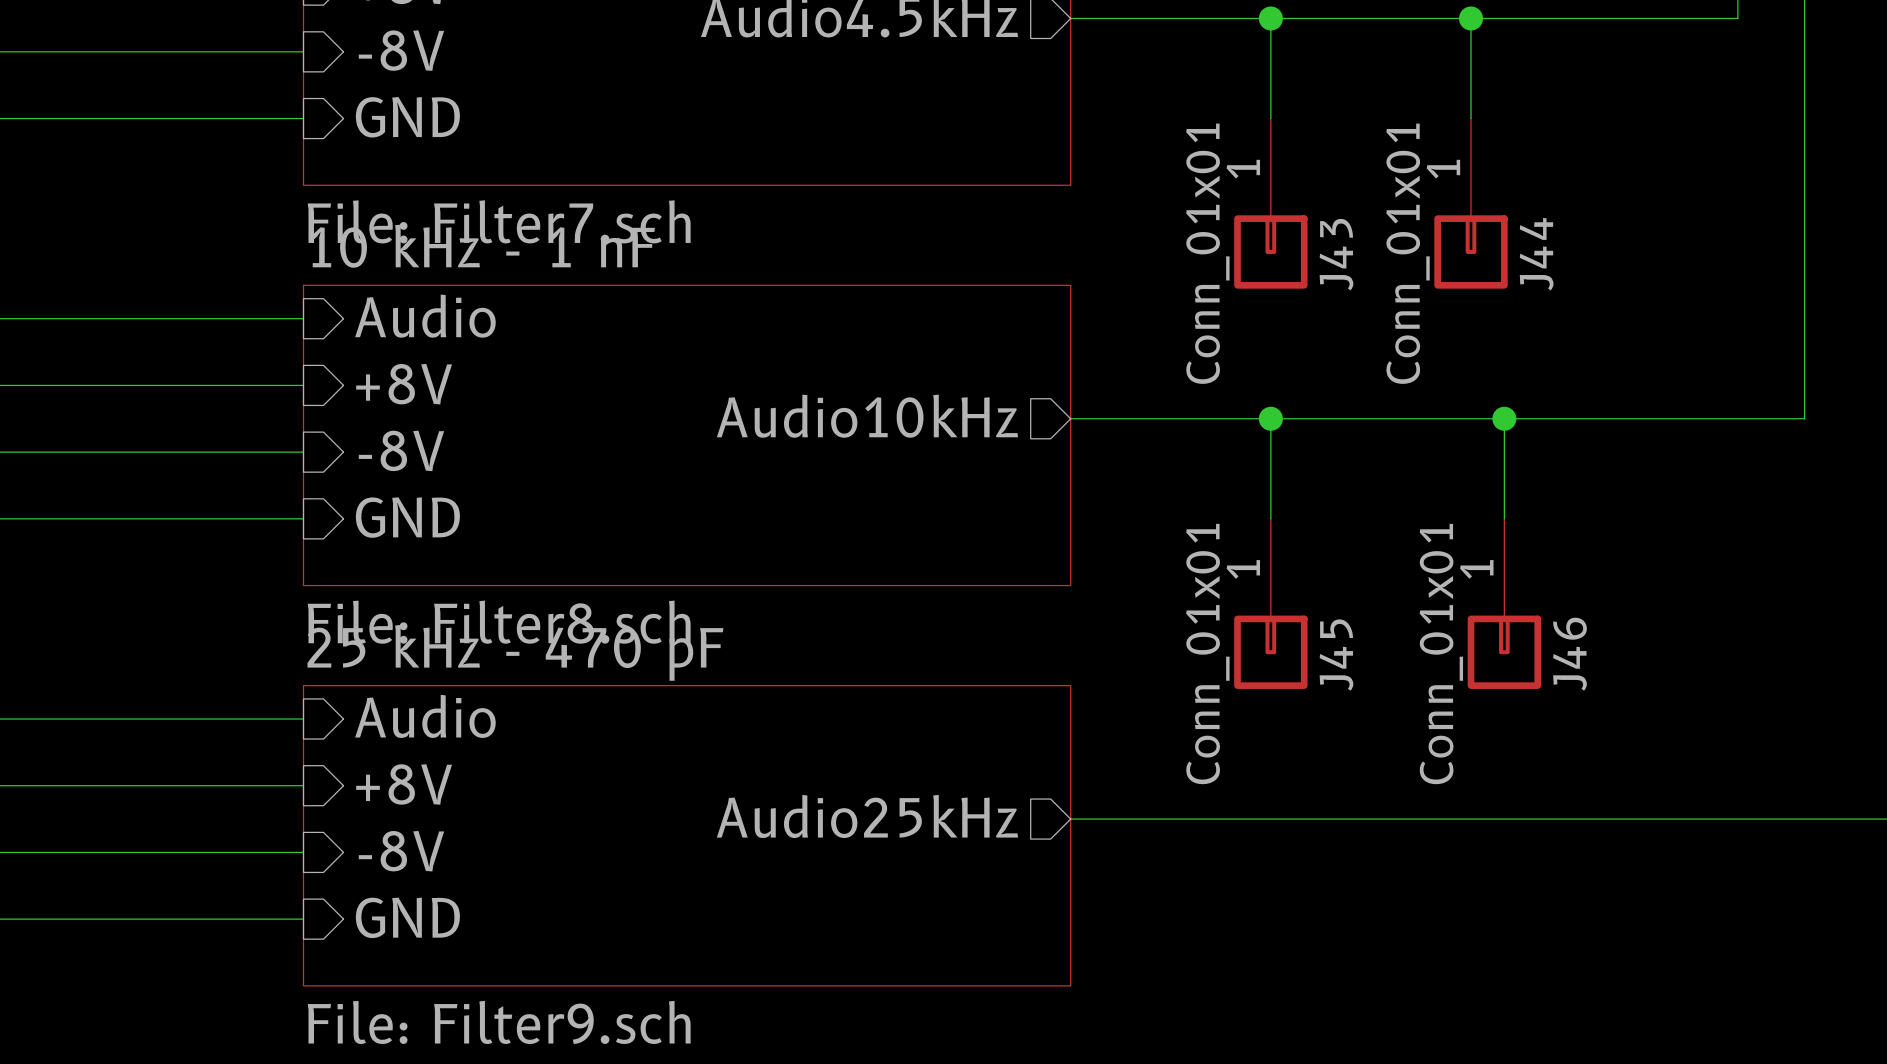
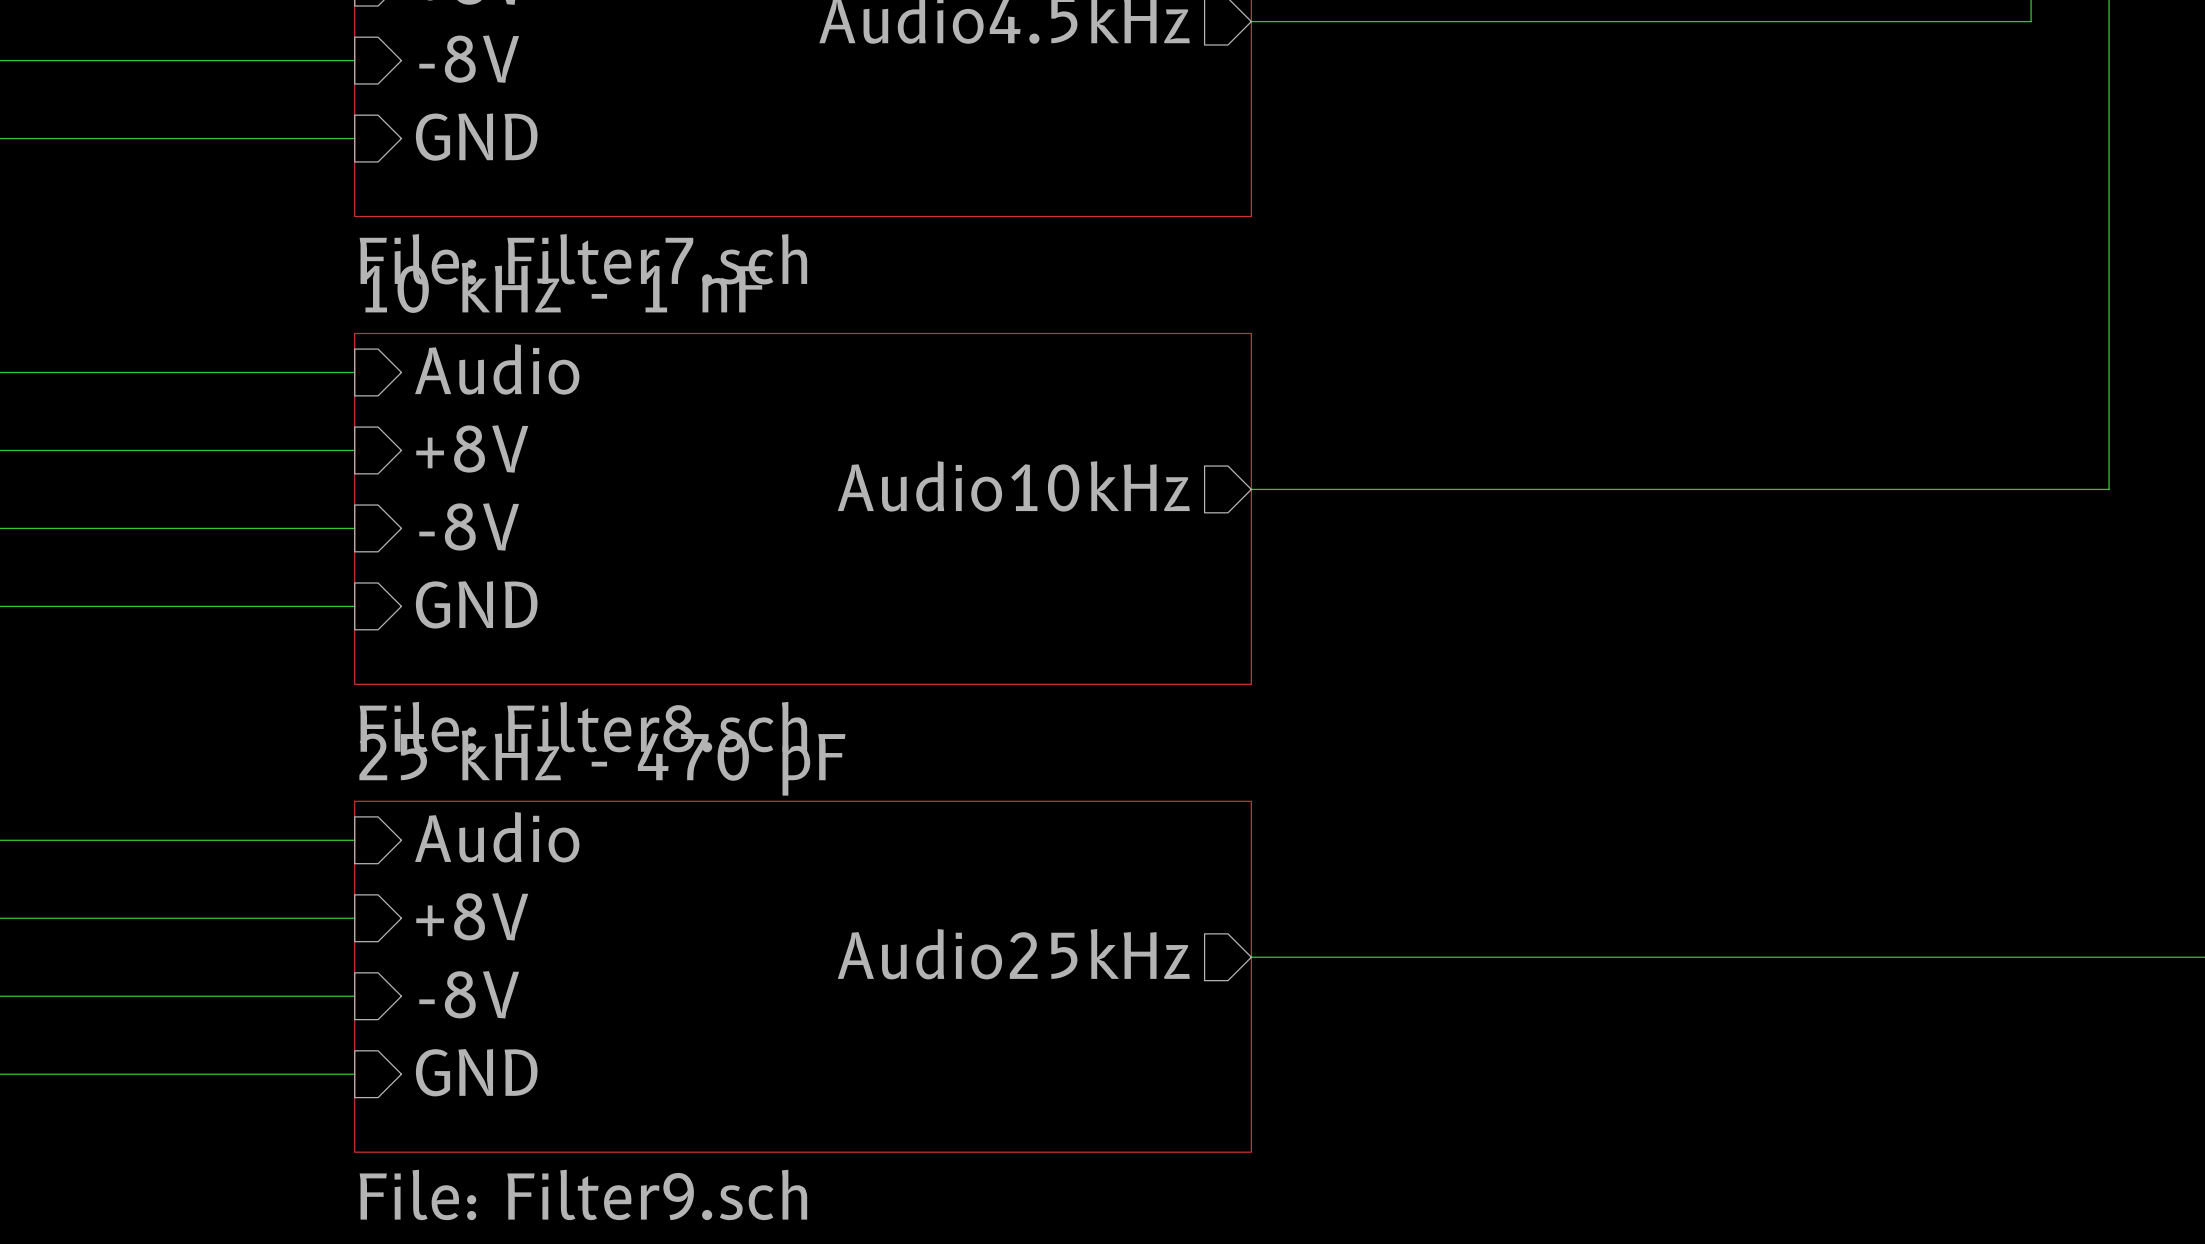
wire: (1270, 18) (1270, 118) -> none
junction: (1270, 18) -> none
wire: (1471, 18) (1471, 118) -> none
junction: (1471, 18) -> none
J43: Conn_01x01 (1270, 203) -> none
J44: Conn_01x01 (1471, 203) -> none
wire: (1270, 418) (1270, 518) -> none
junction: (1270, 418) -> none
wire: (1504, 418) (1504, 518) -> none
junction: (1504, 418) -> none
J45: Conn_01x01 (1270, 603) -> none
J46: Conn_01x01 (1504, 603) -> none

